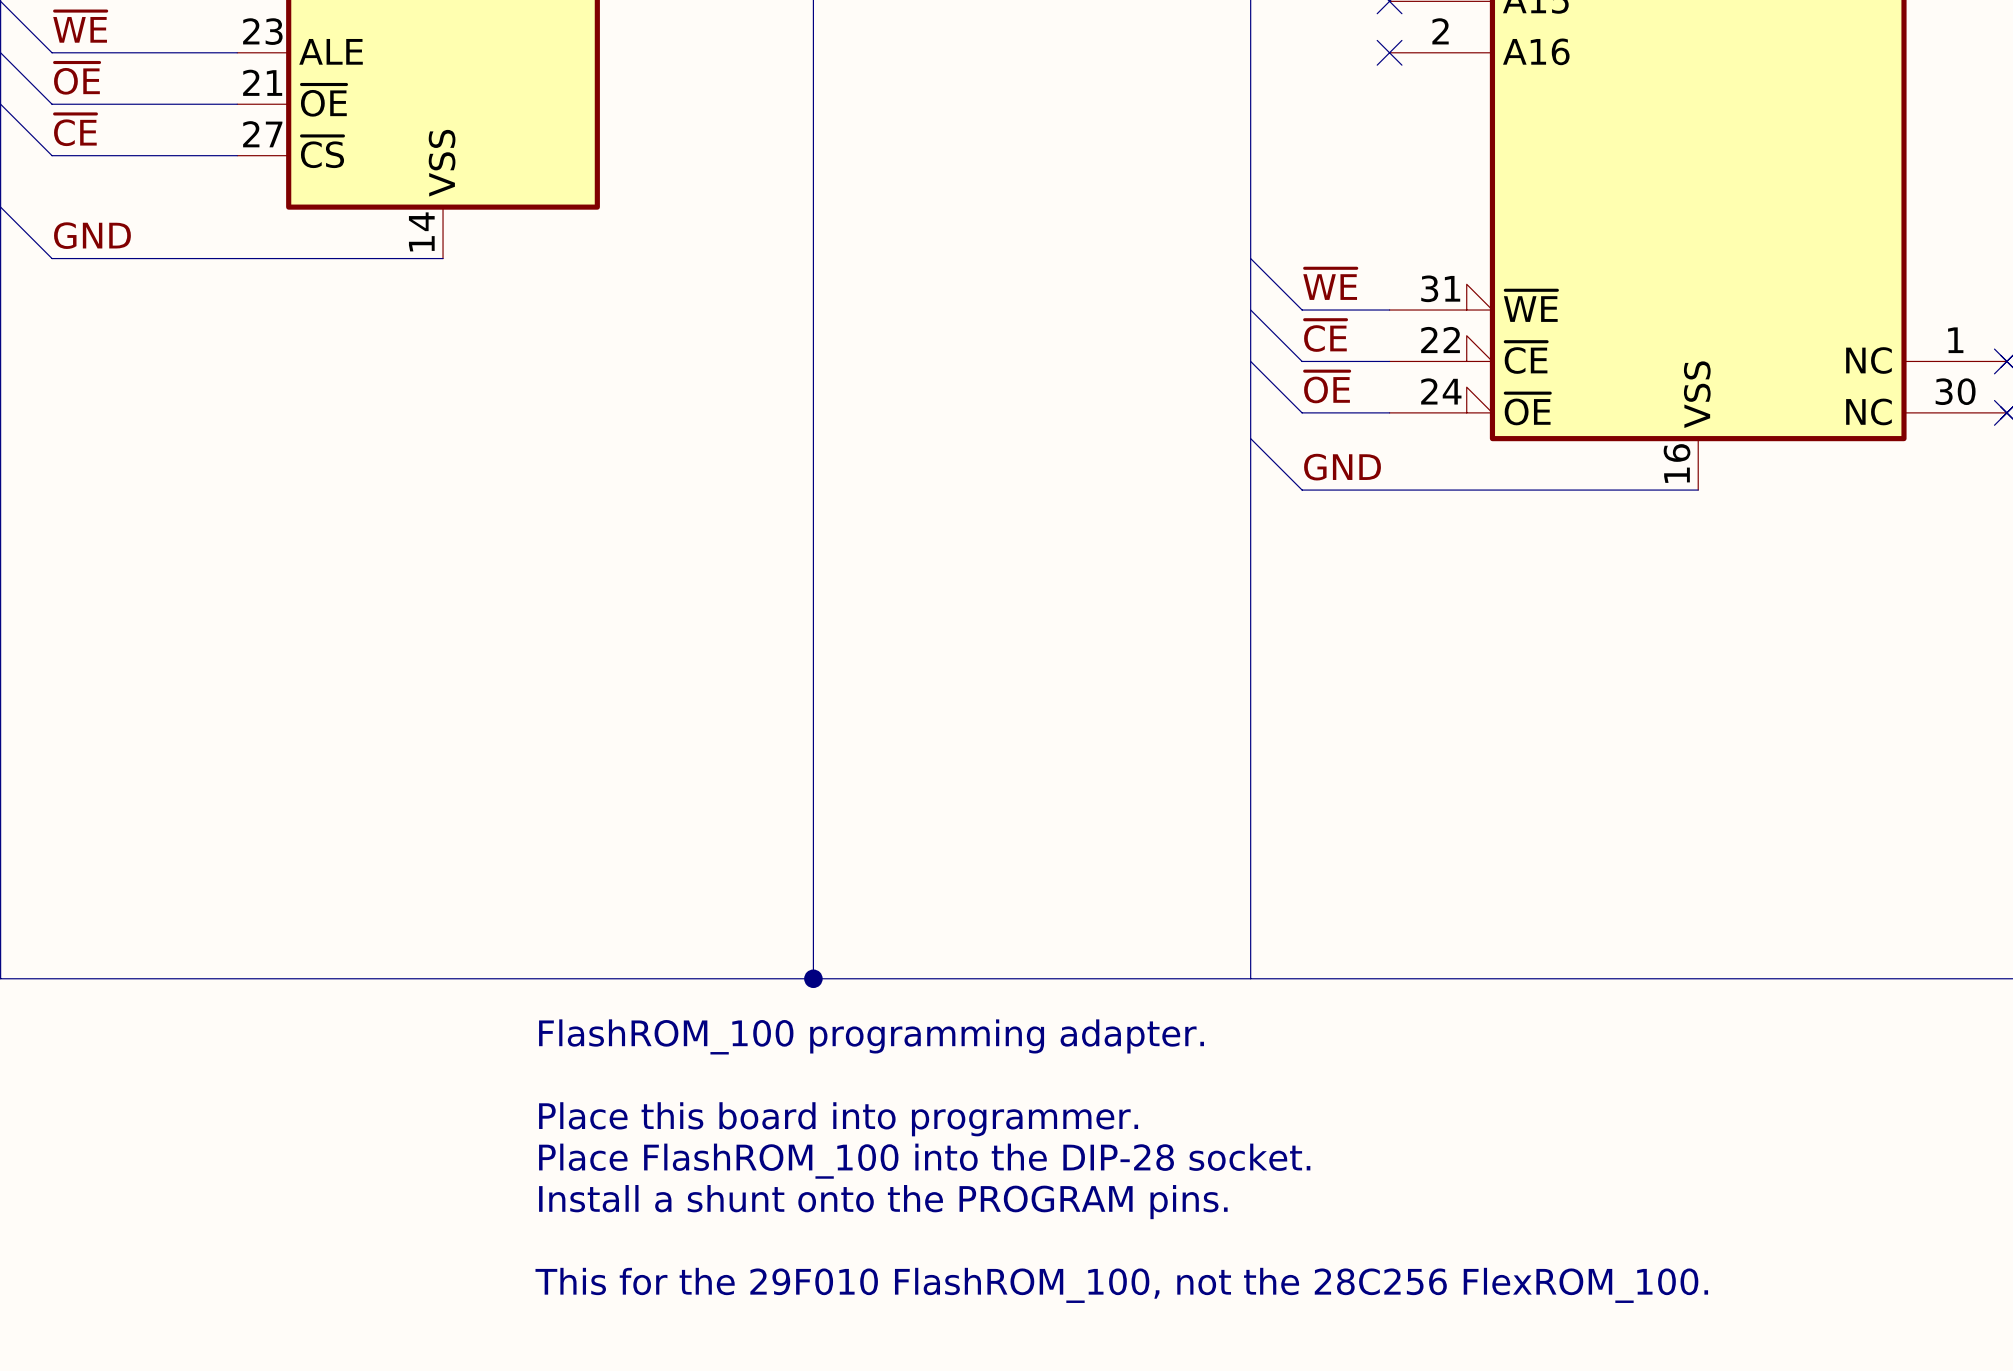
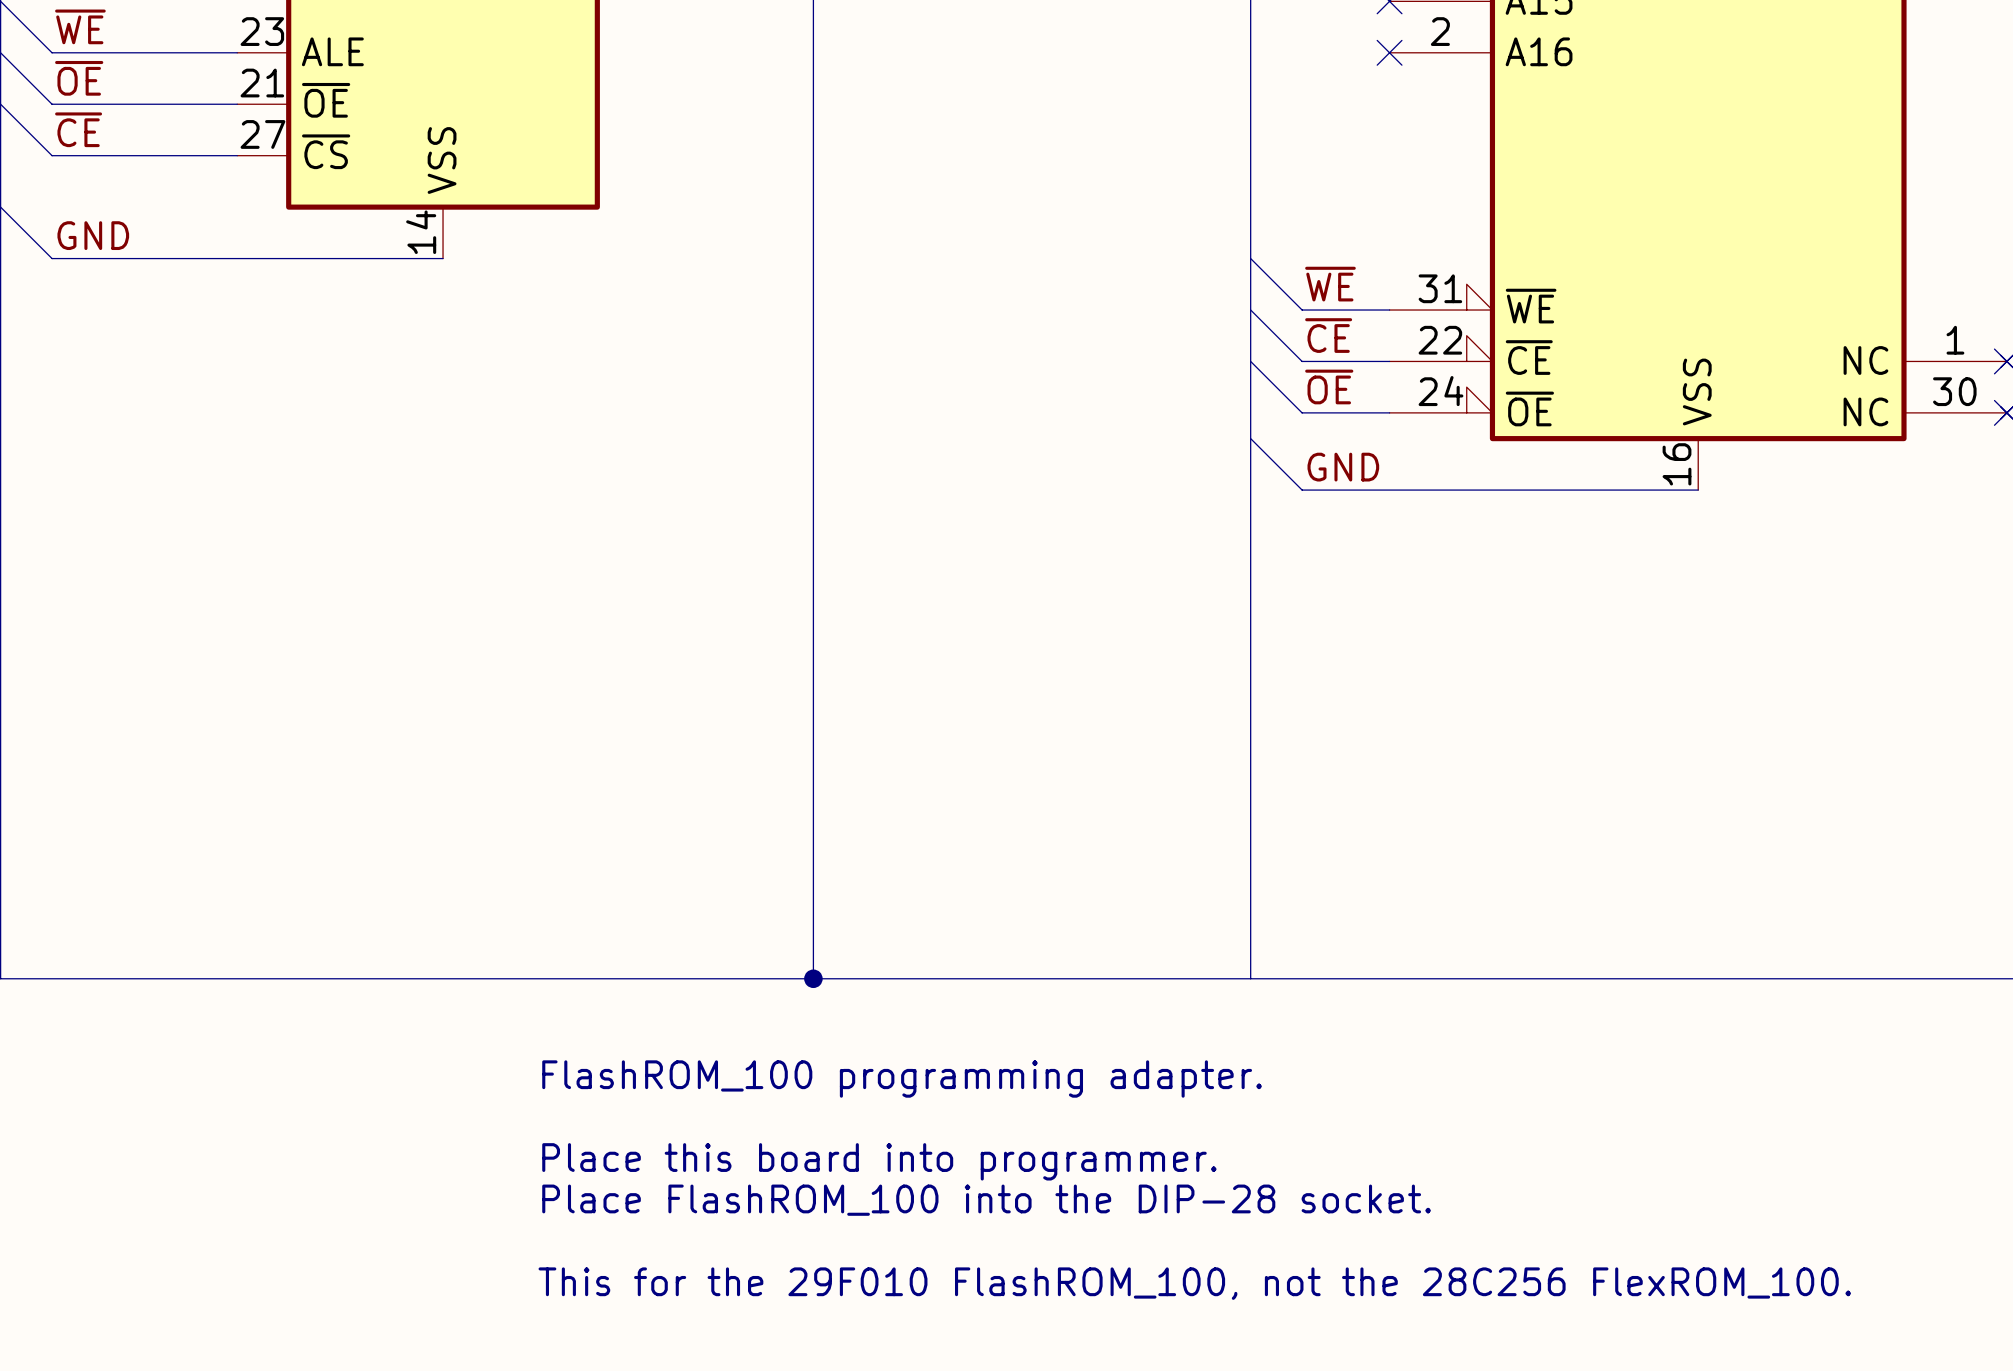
text position: FlashROM_100 programming adapter. (871, 1036) -> FlashROM_100 programming adapter. (902, 1079)
text: Place this board into programmer. (838, 1119) -> none
text: Place FlashROM_100 into the DIP-28 socket. (924, 1161) -> Place this board into programmer. (879, 1161)
text: Install a shunt onto the PROGRAM pins. (883, 1202) -> Place FlashROM_100 into the DIP-28 socket. (986, 1200)

